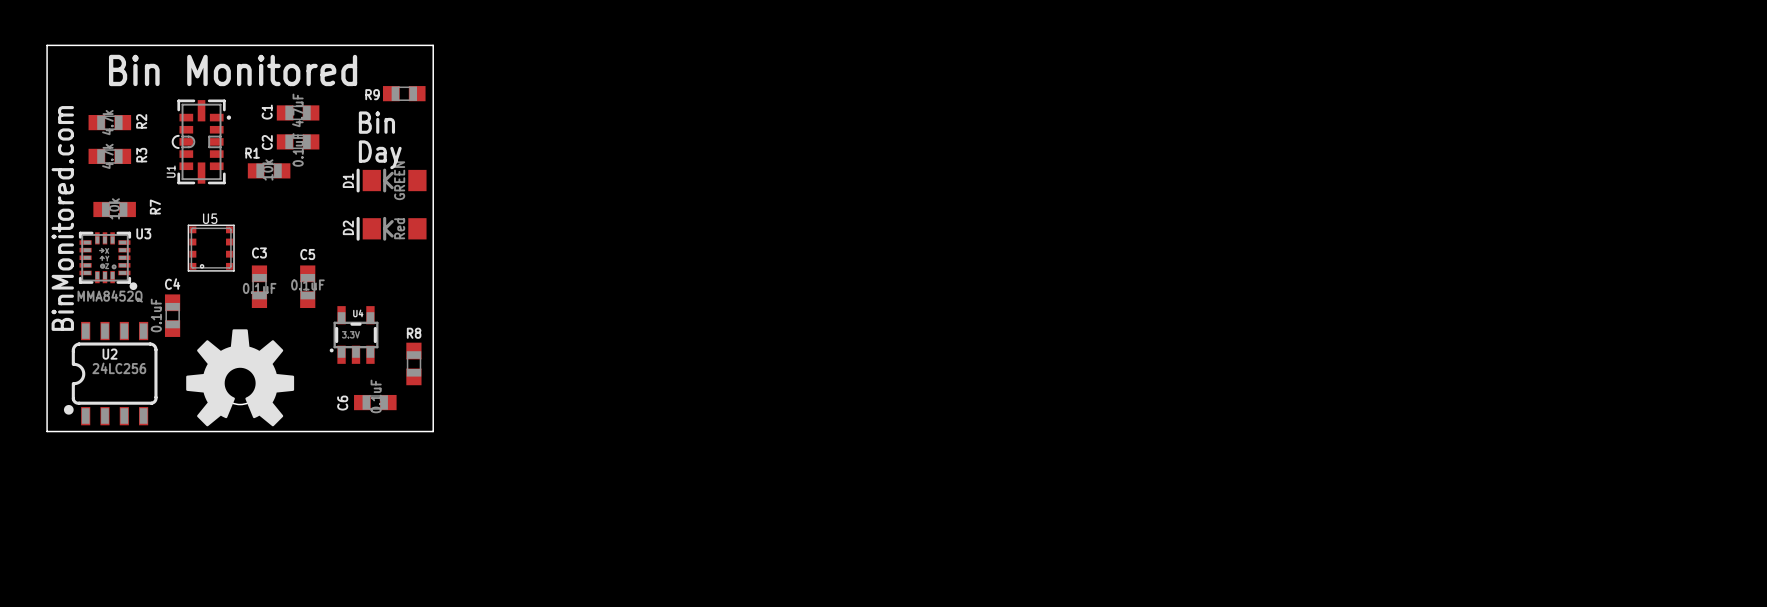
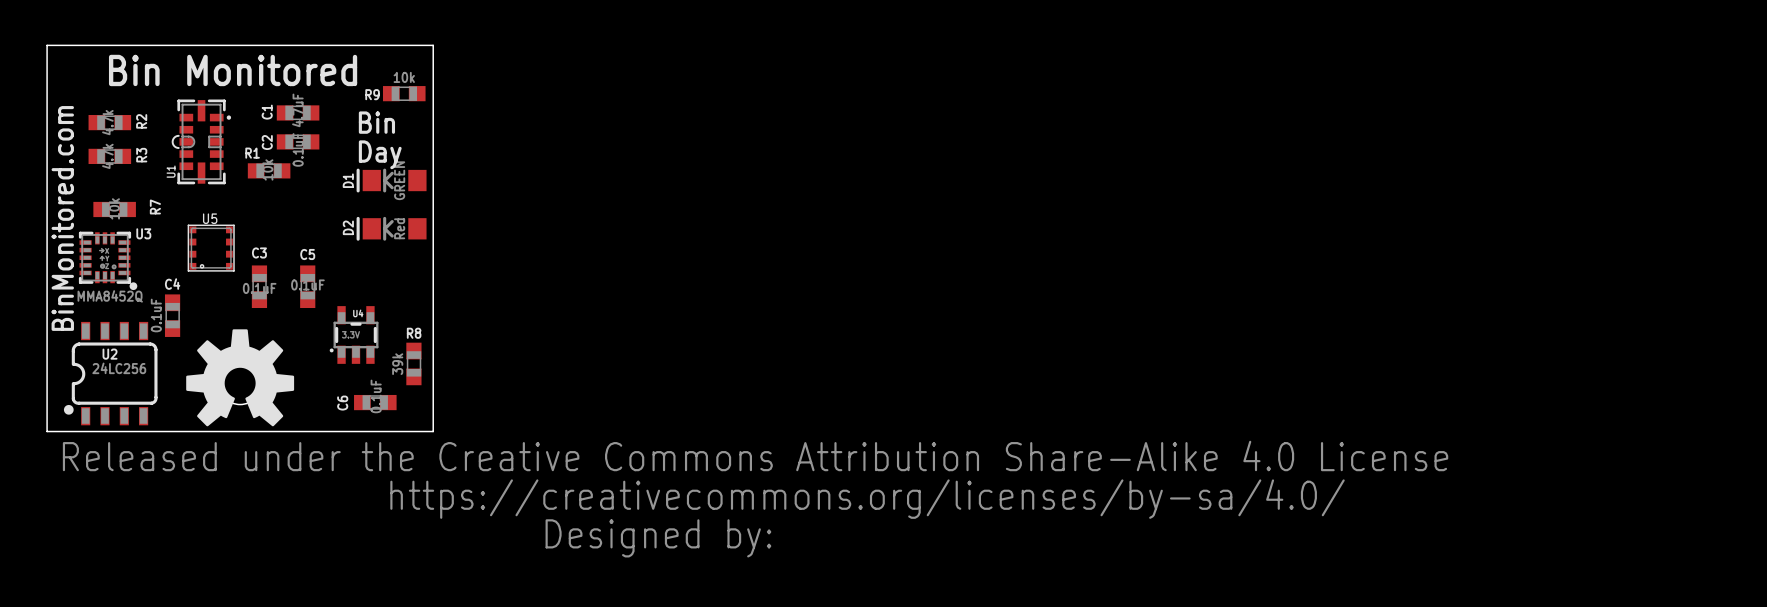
R9 value: none -> 10k (404, 77)
R8 value: none -> 39k (397, 364)
drawing: none -> [62, 440, 1449, 558]

